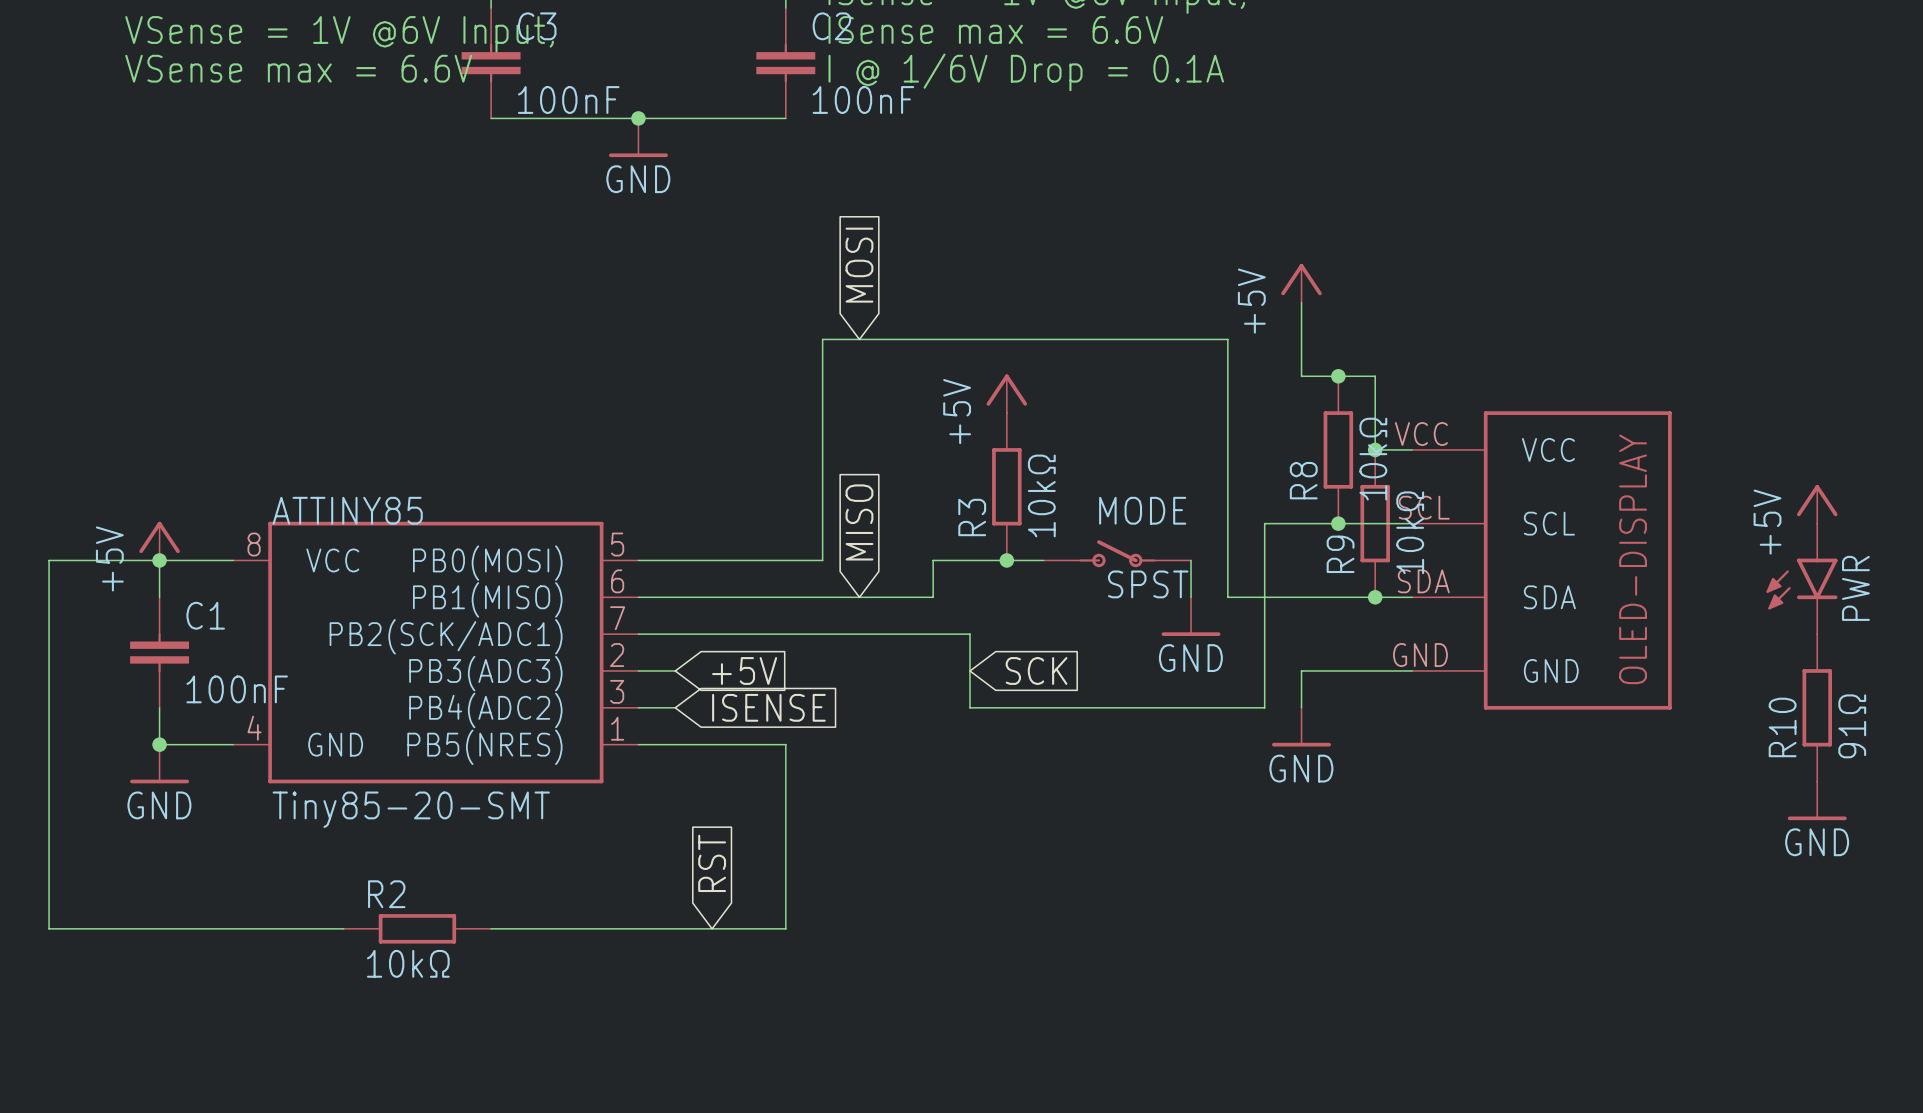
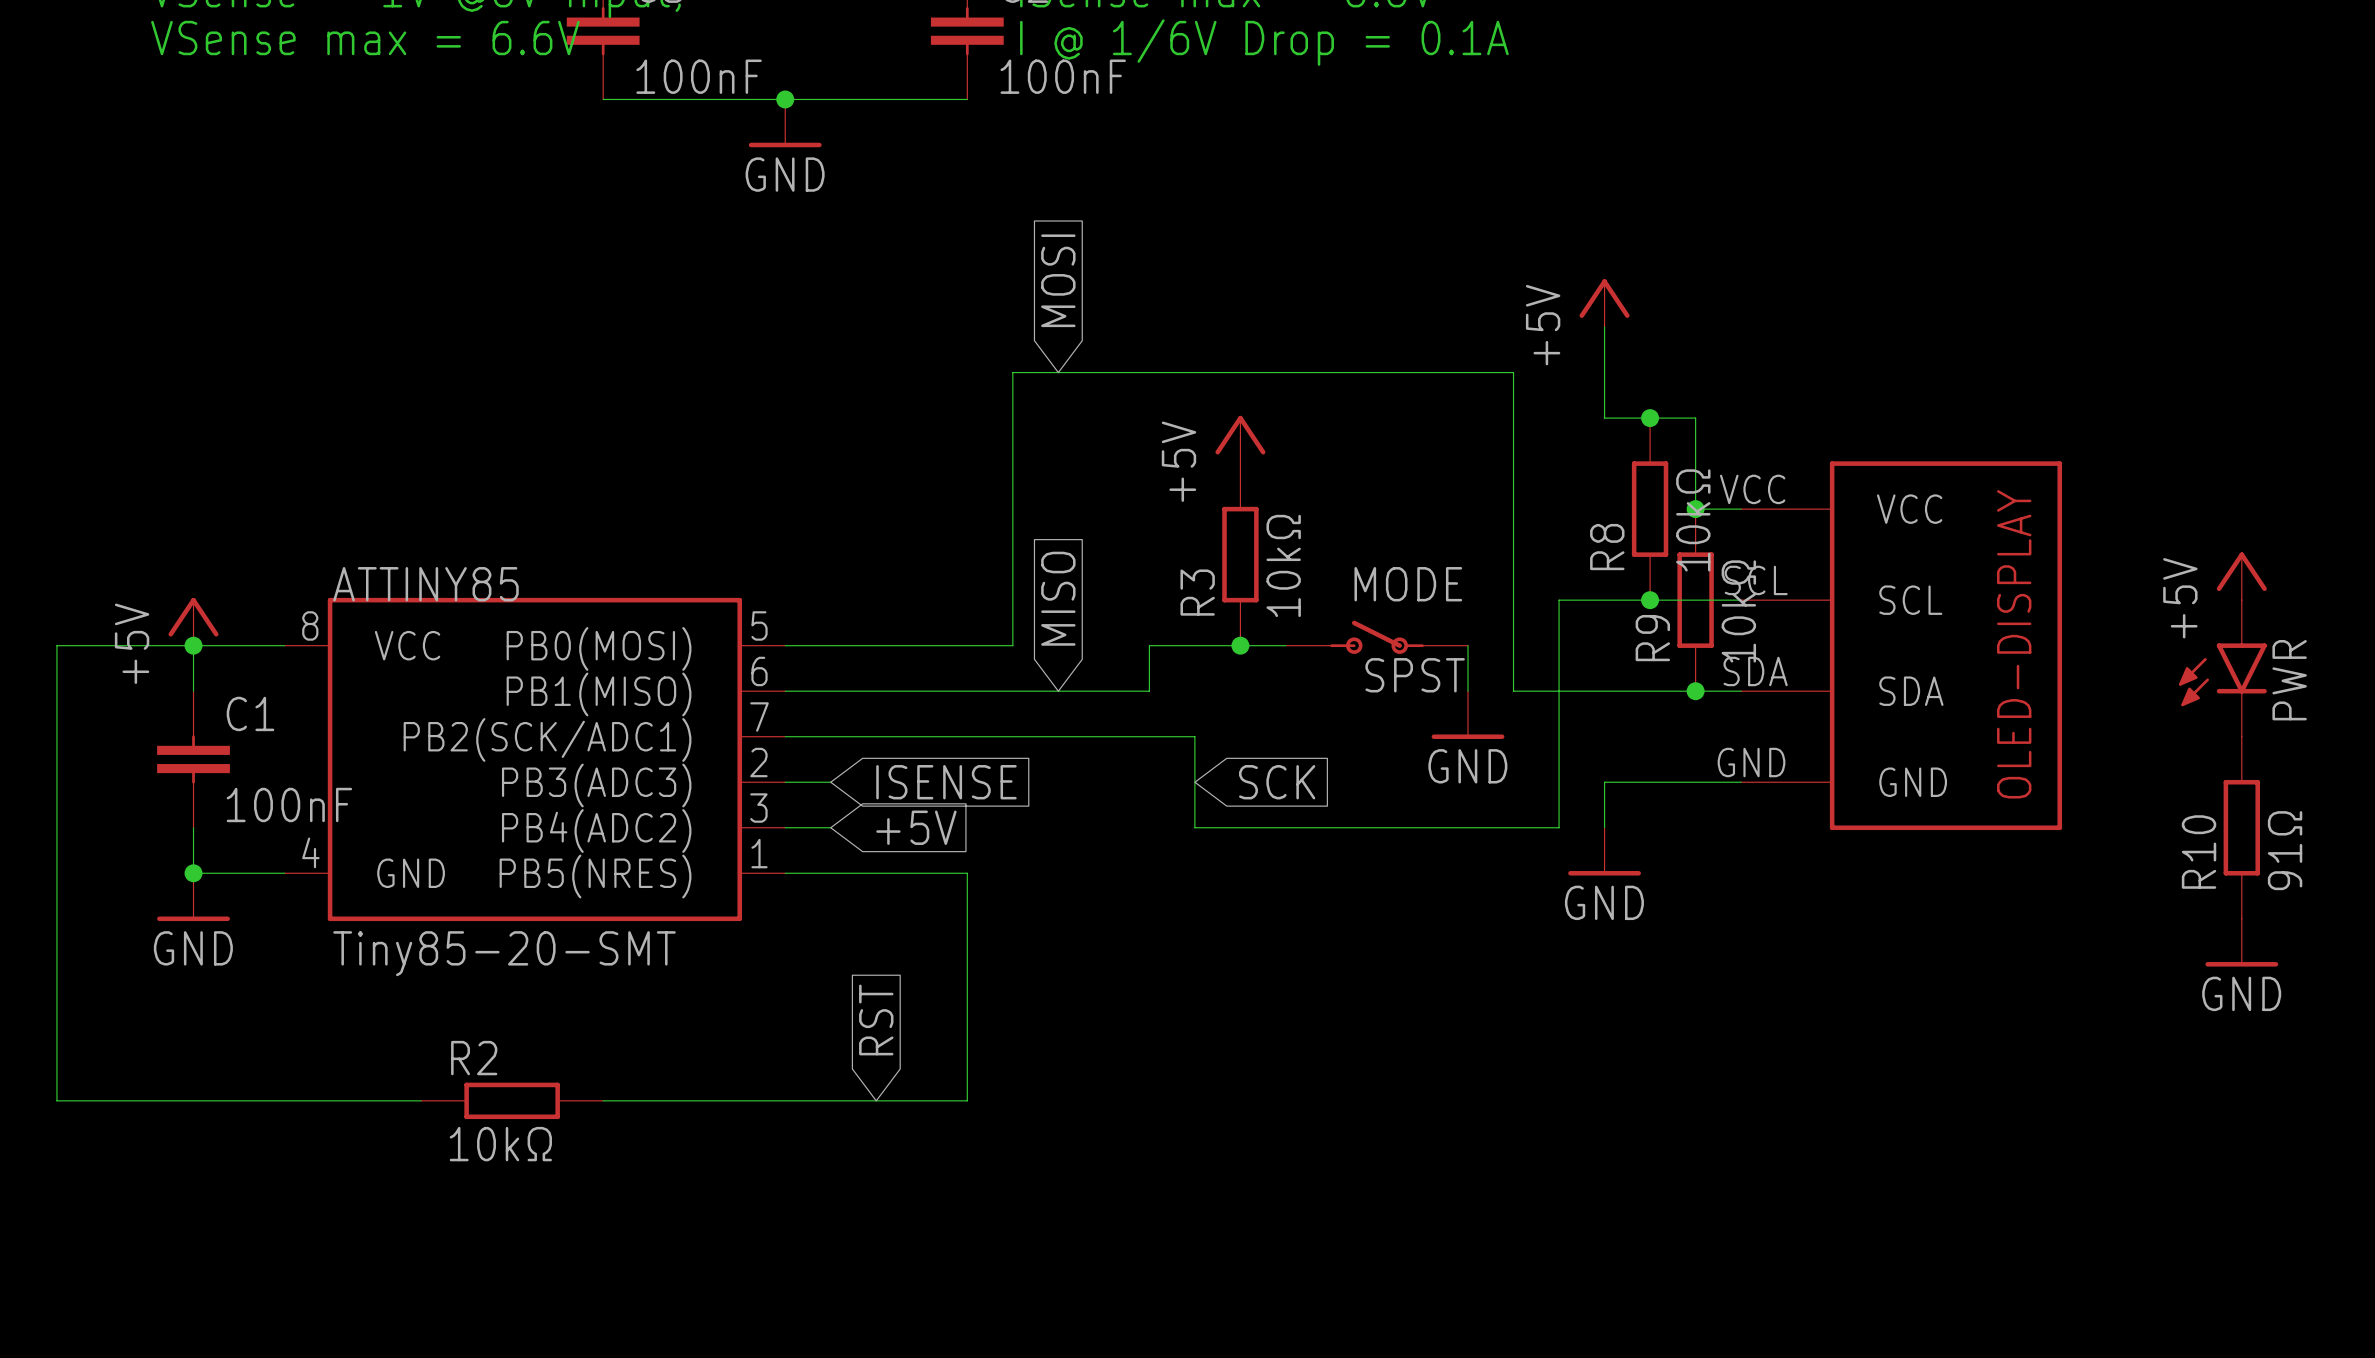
global label: +5V (744, 670) -> ISENSE (946, 782)
global label: ISENSE (768, 707) -> +5V (916, 827)

